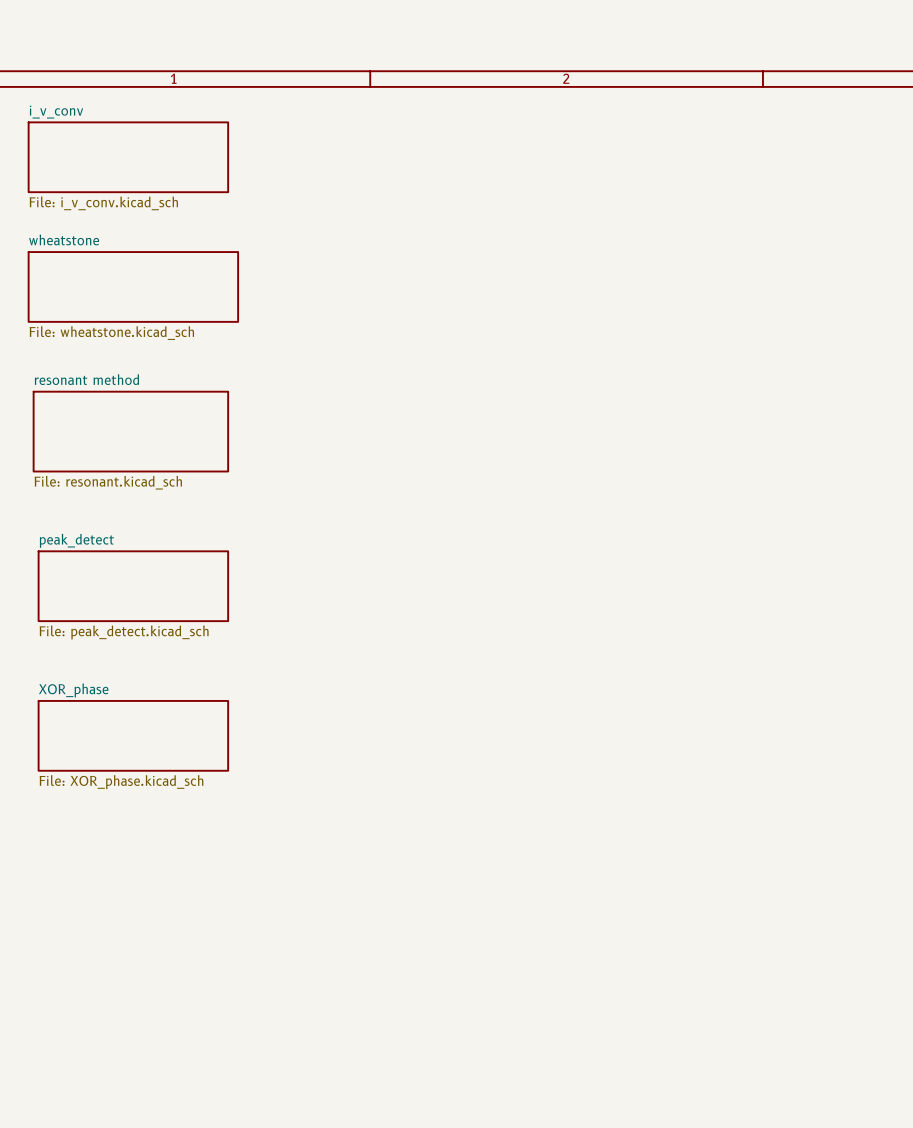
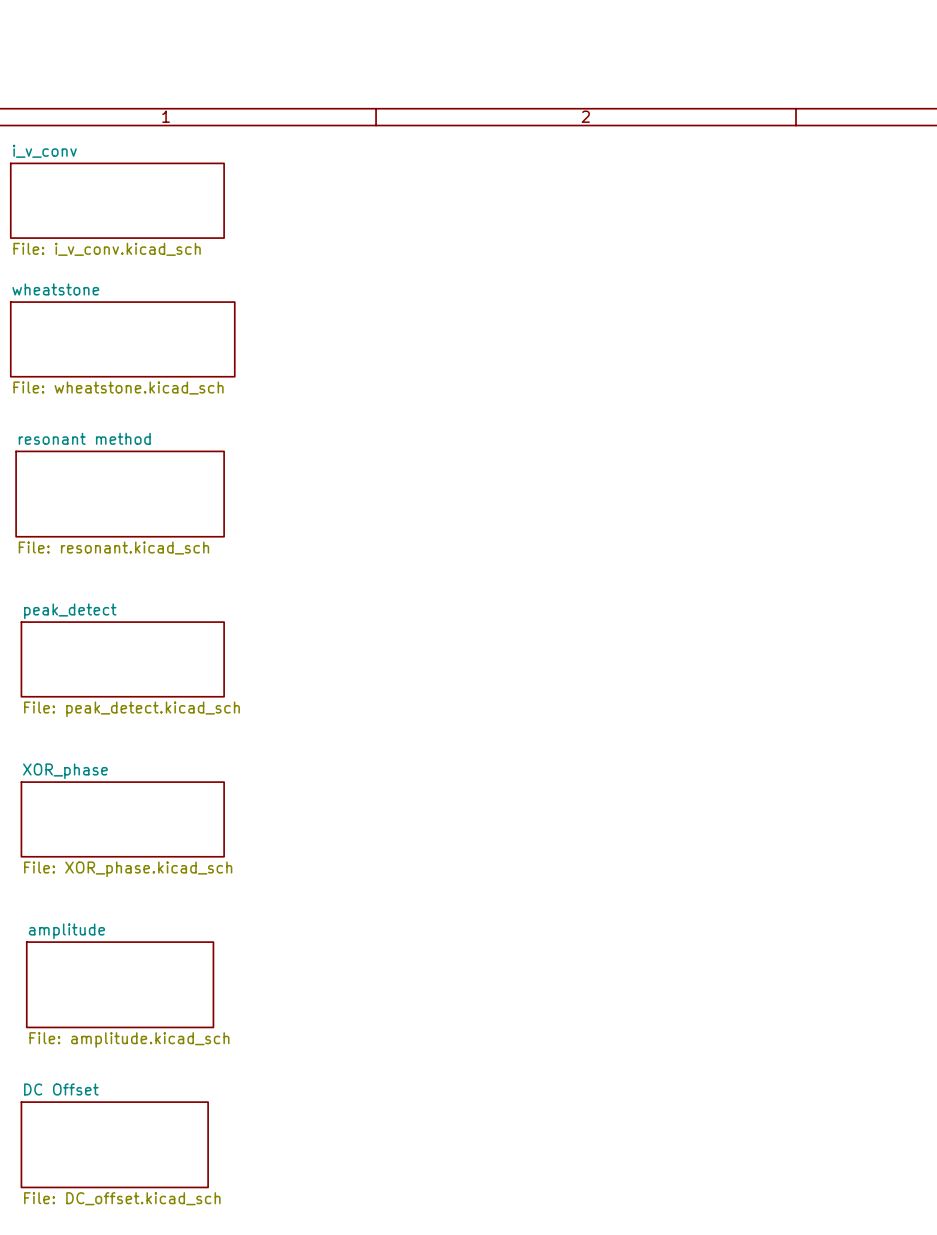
sheet amplitude: none -> File: amplitude.kicad_sch (120, 984)
sheet DC Offset: none -> File: DC_offset.kicad_sch (114, 1144)

